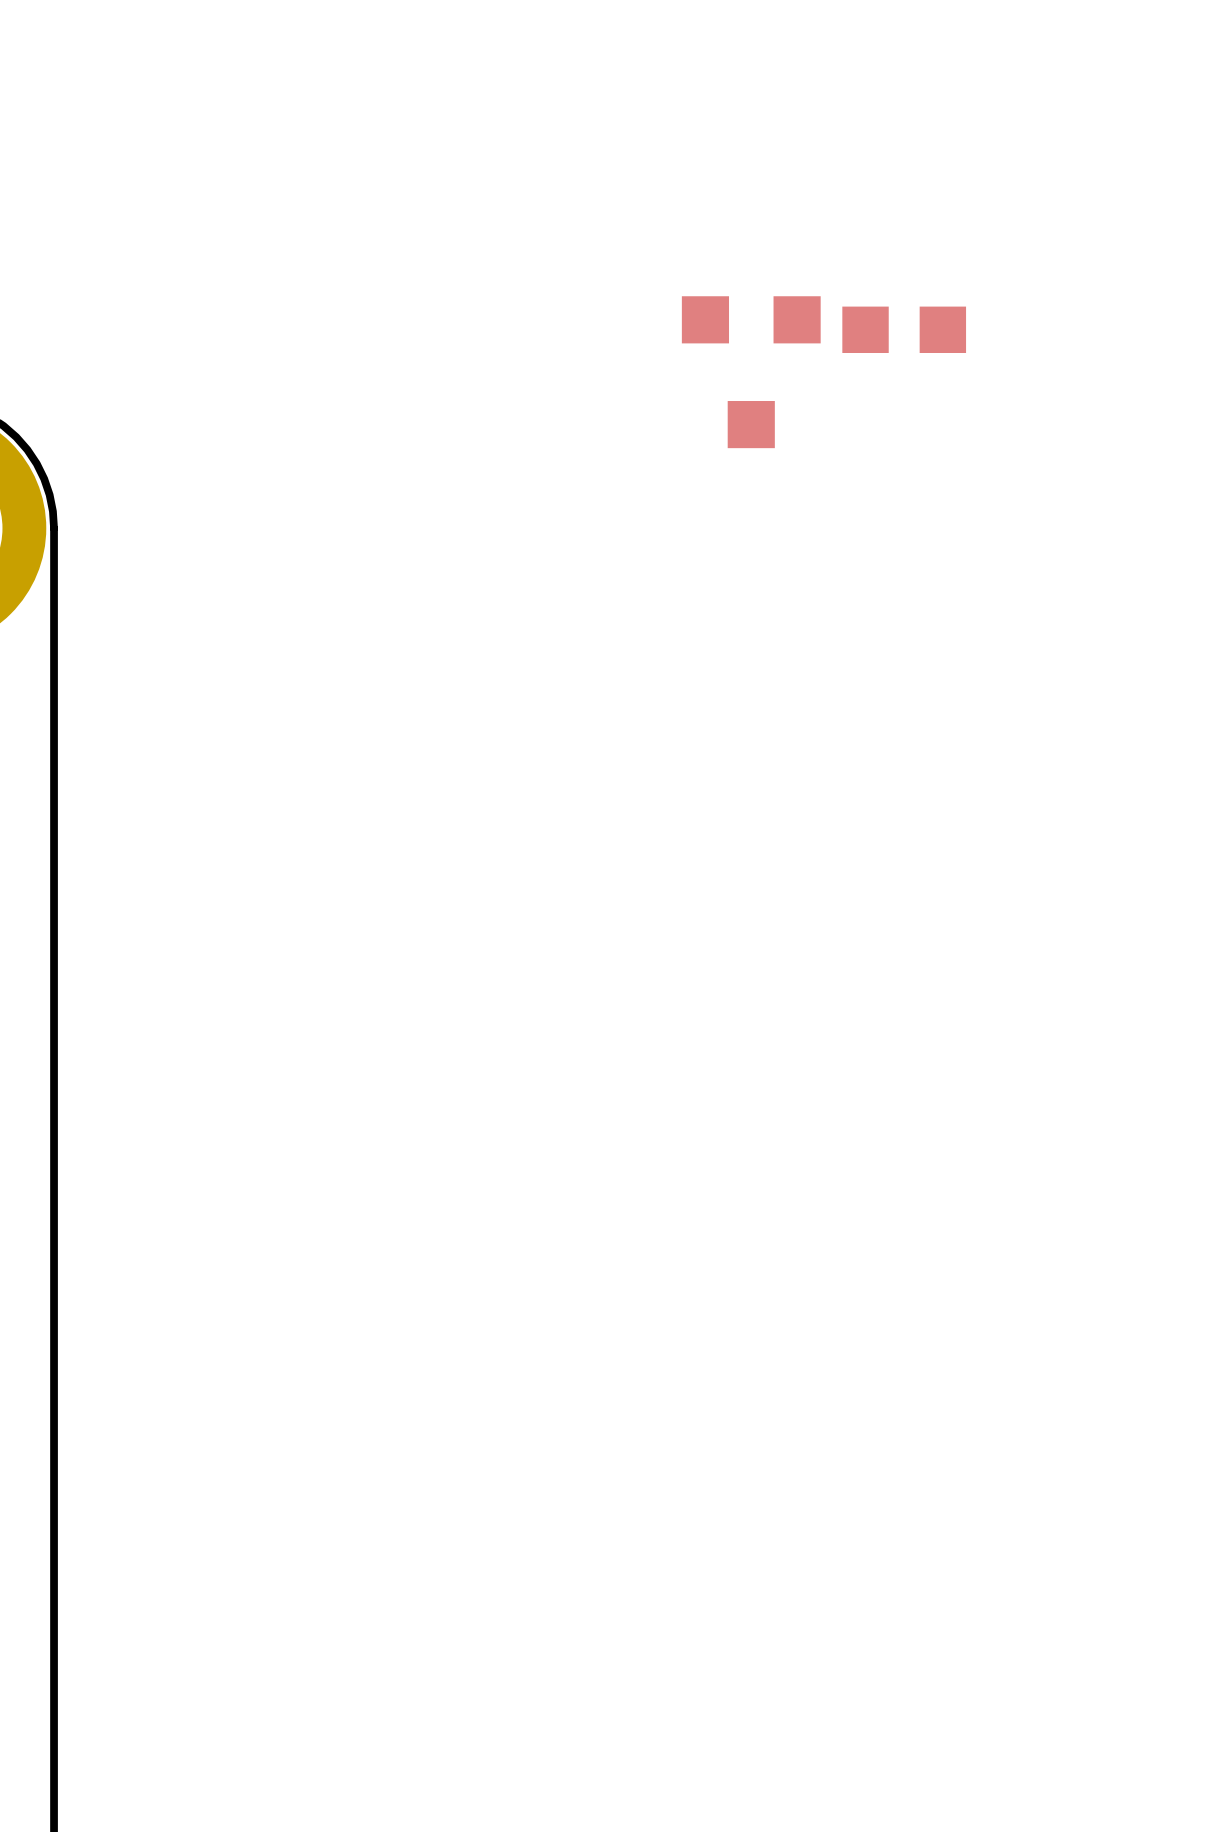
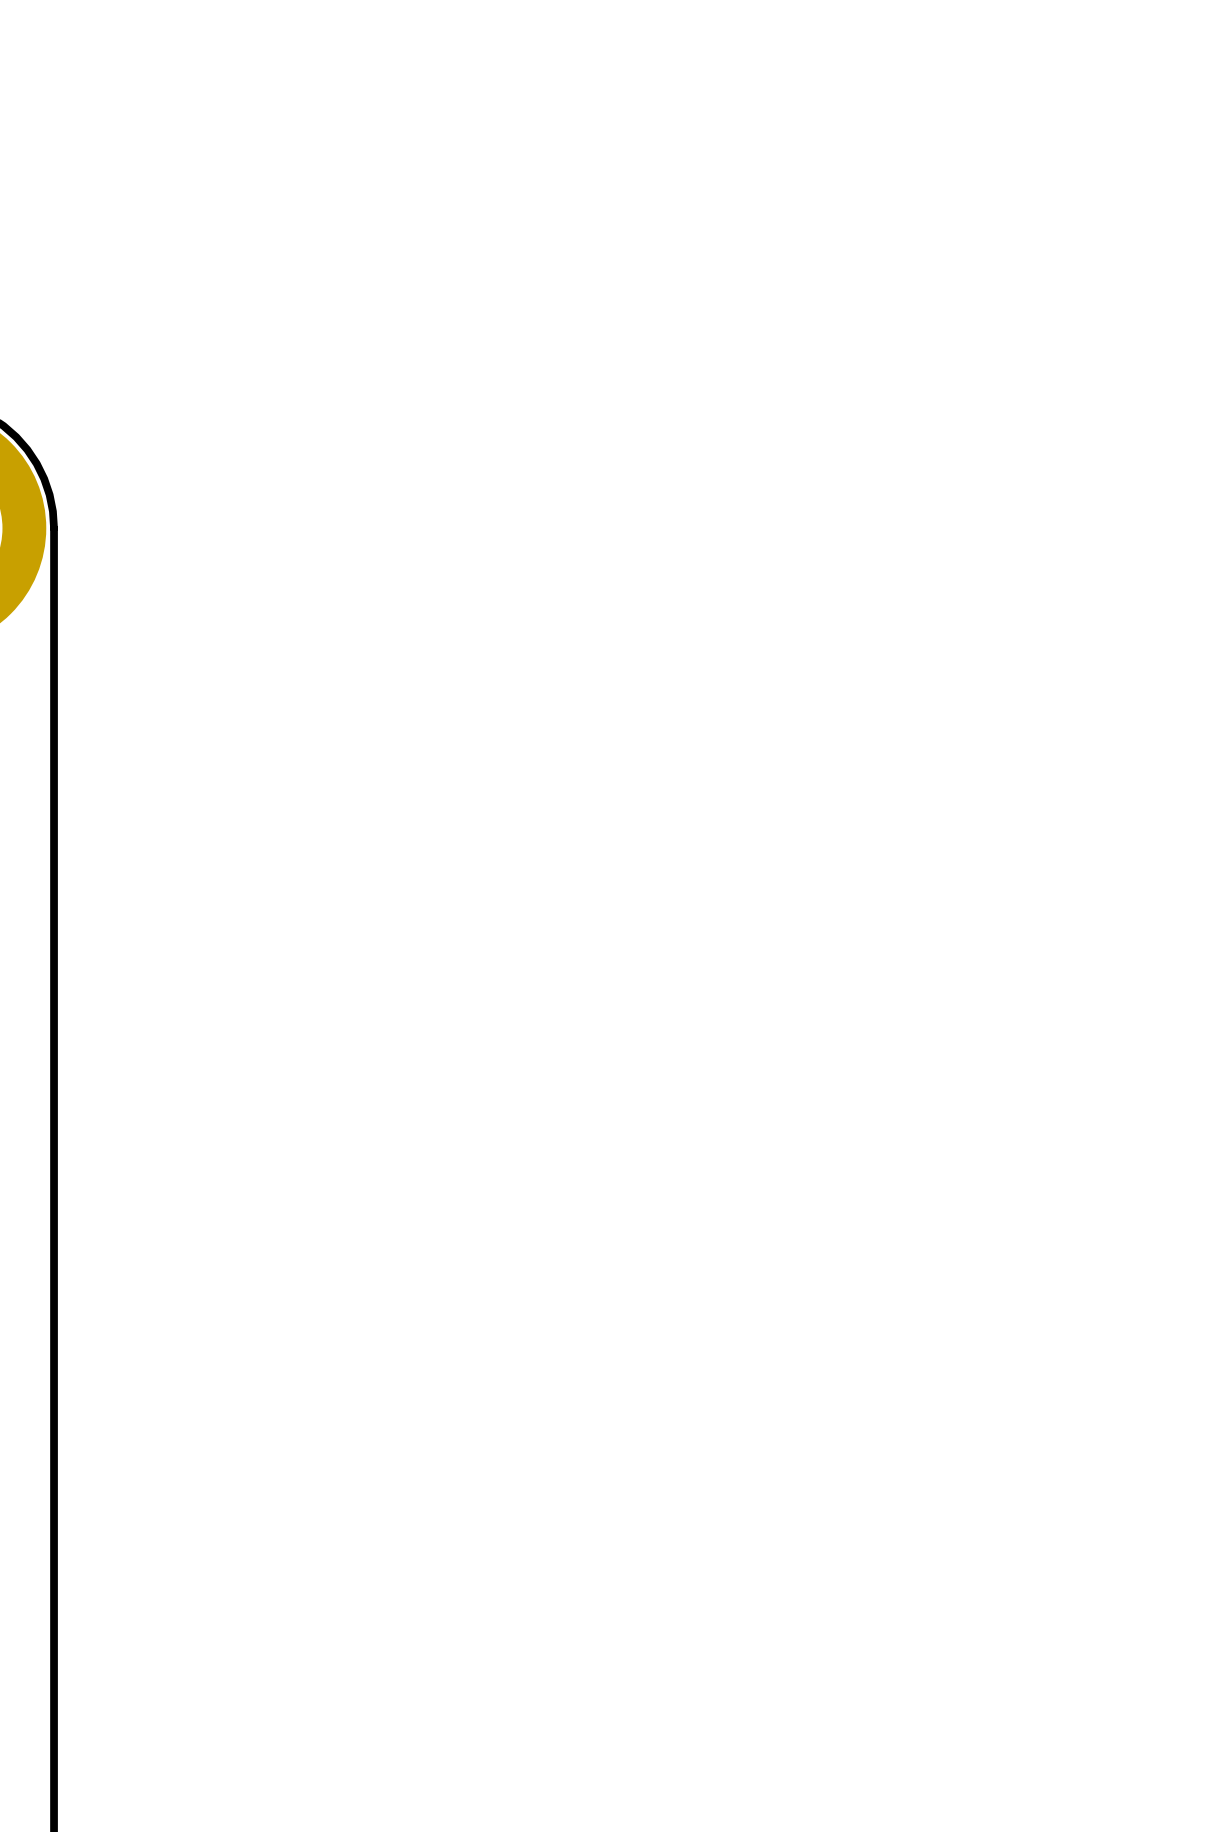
part: (904, 329) -> none
part: (751, 372) -> none

